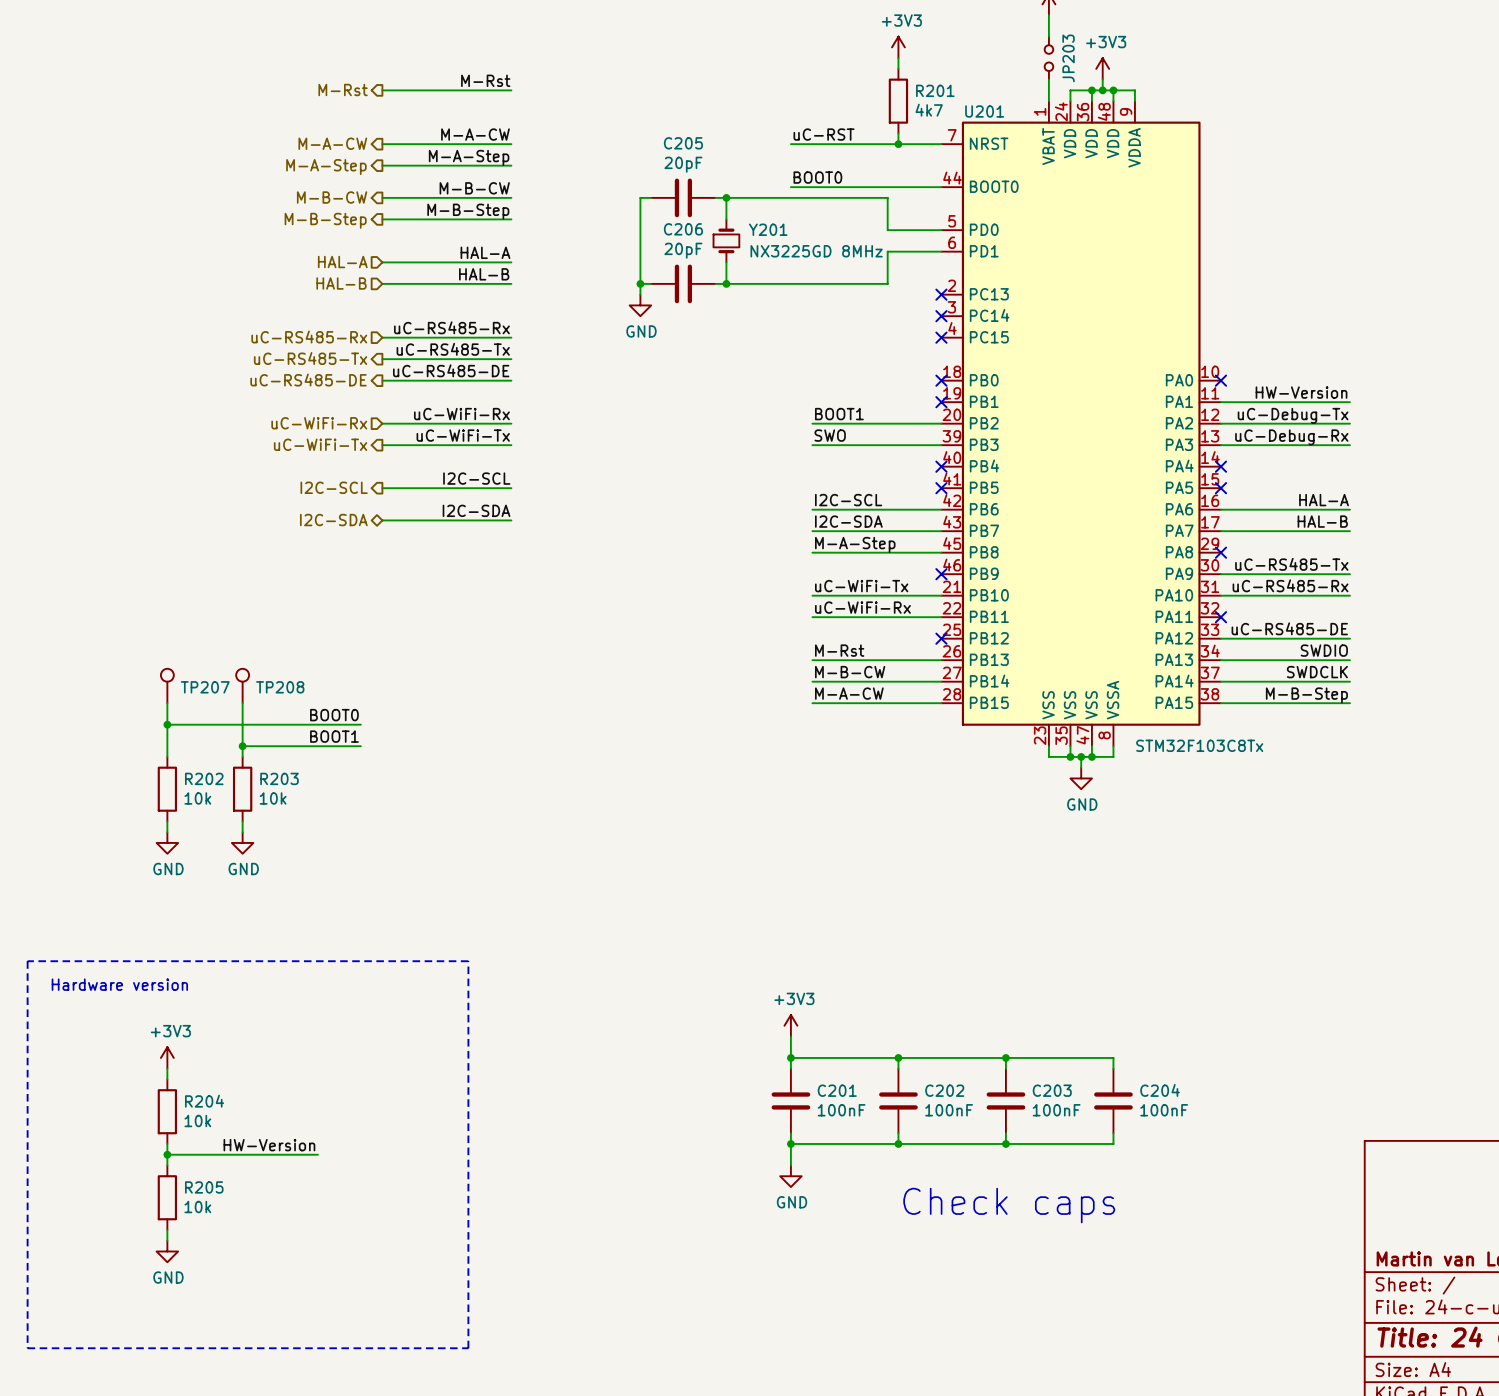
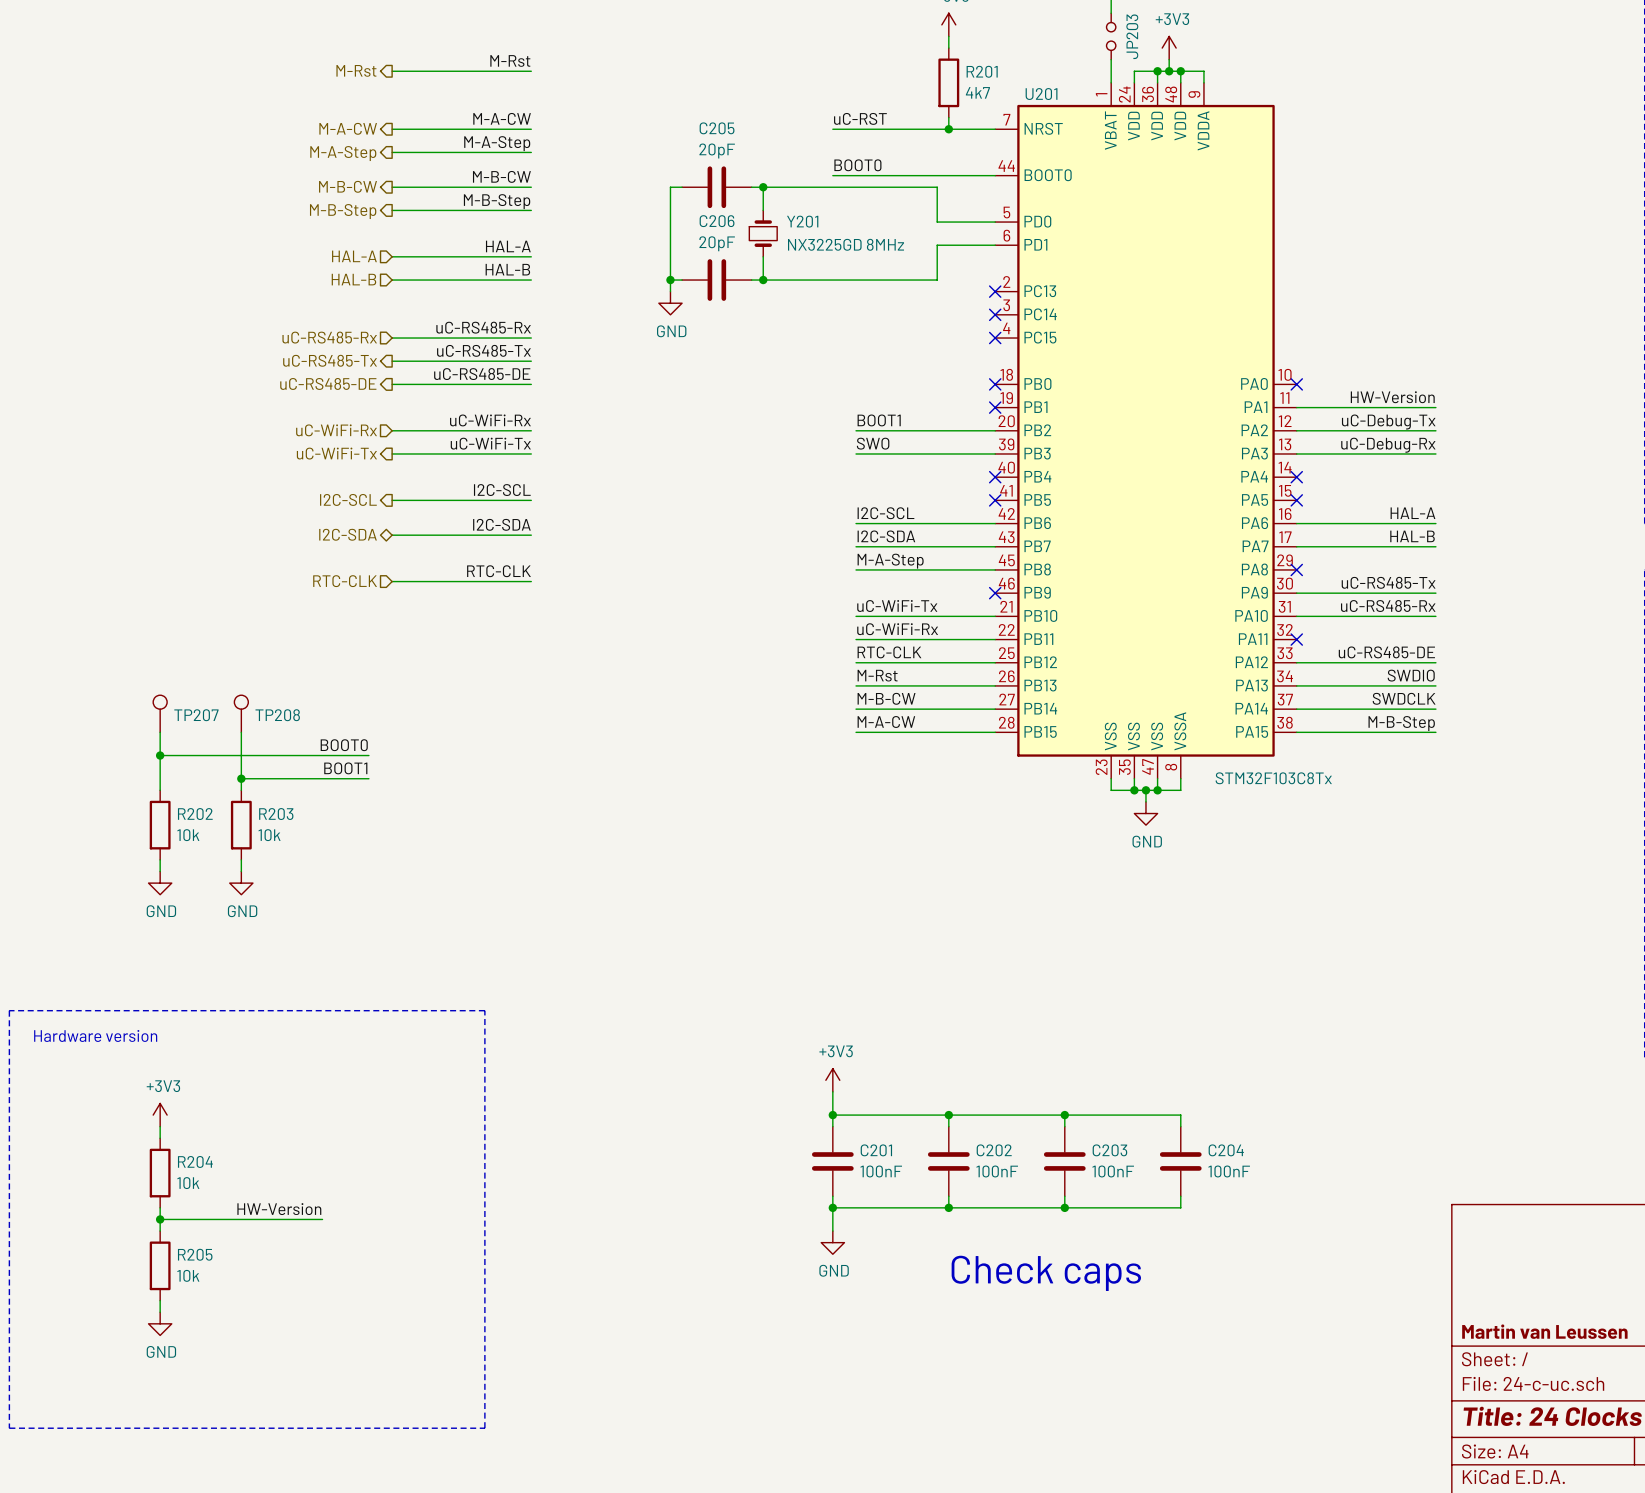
label: none -> RTC-CLK (498, 571)
hierarchical label: none -> RTC-CLK (345, 581)
wire: none -> (392, 581) (531, 581)
label: none -> RTC-CLK (889, 652)
wire: none -> (856, 662) (995, 662)
no-connect mark: (941, 638) -> none

